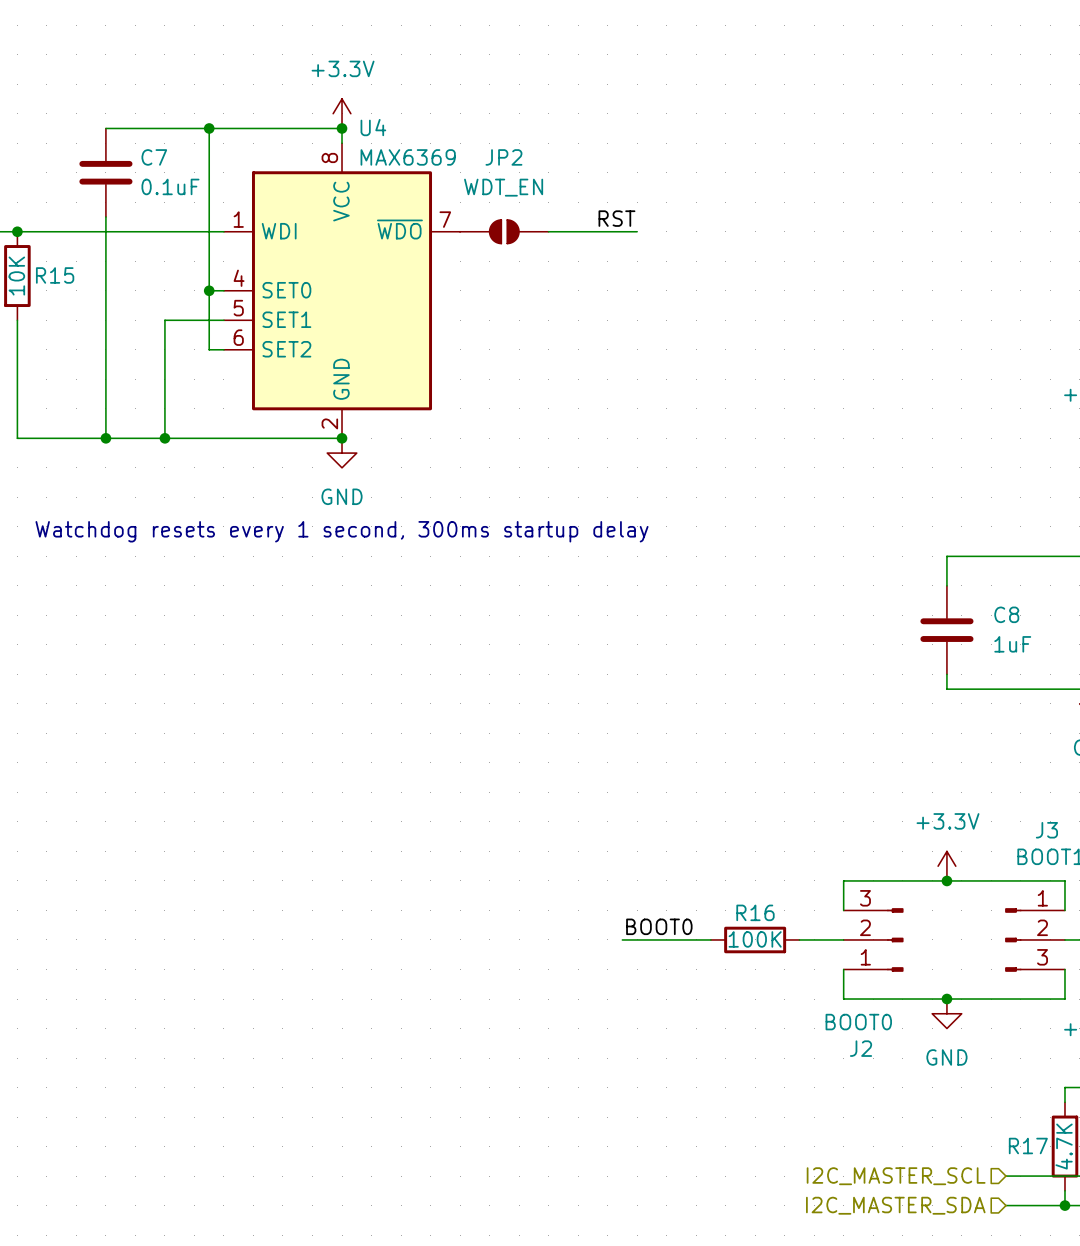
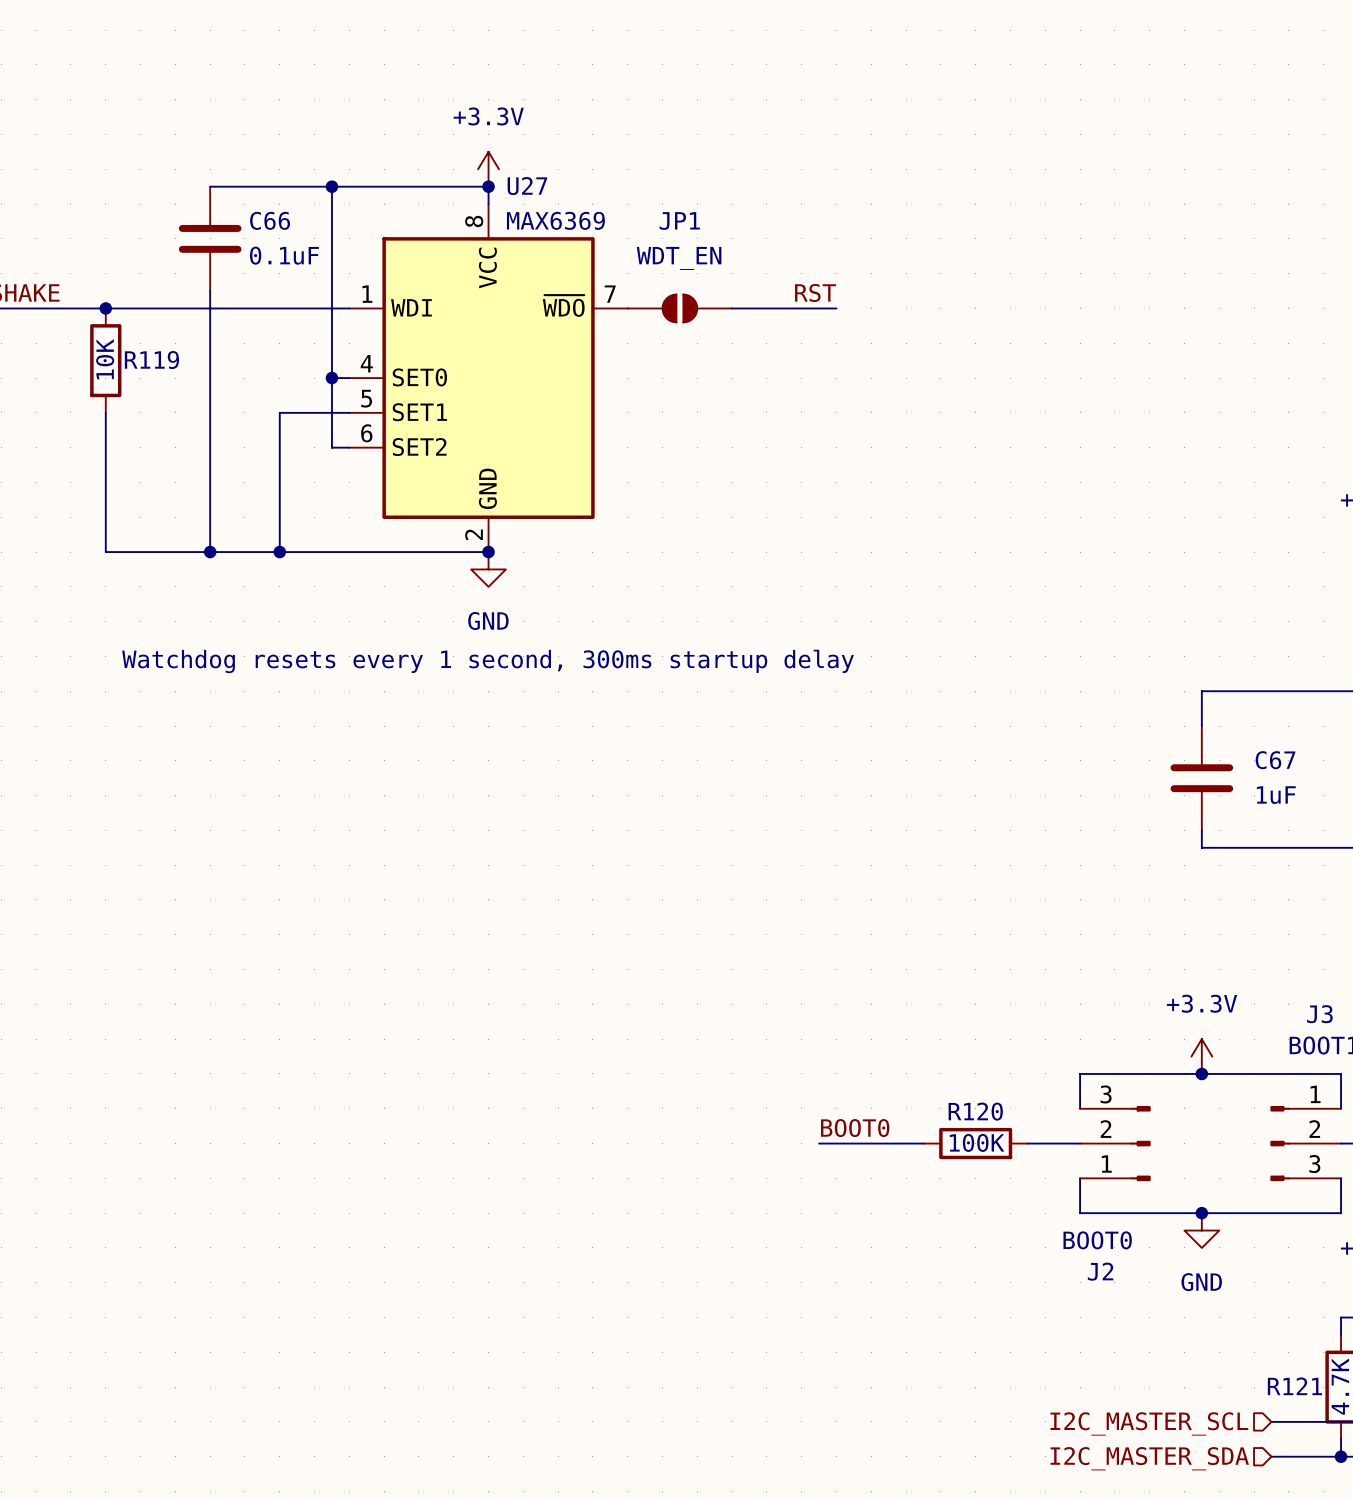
U4 name: U4 (373, 127) -> U27 (527, 186)
C7 name: C7 (154, 157) -> C66 (270, 220)
JP2 name: JP2 (503, 157) -> JP1 (679, 221)
R15 name: R15 (55, 275) -> R119 (151, 360)
C8 name: C8 (1006, 614) -> C67 (1275, 760)
R16 name: R16 (755, 912) -> R120 (975, 1111)
R17 name: R17 (1028, 1146) -> R121 (1294, 1386)

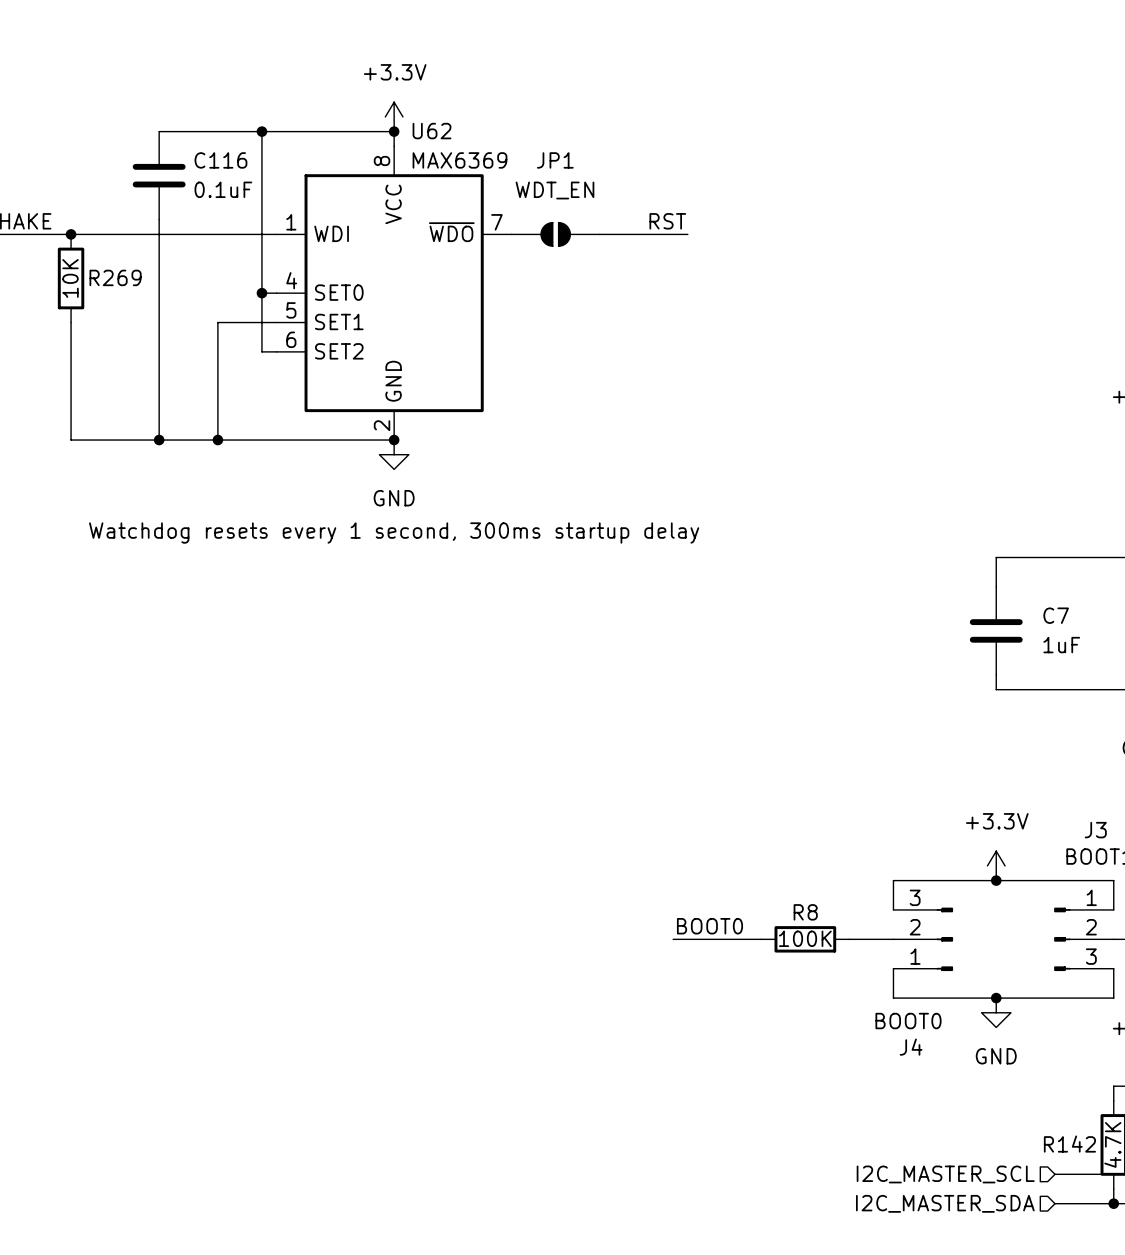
U27 name: U27 (527, 186) -> U62 (432, 131)
C66 name: C66 (270, 220) -> C116 (220, 160)
R119 name: R119 (151, 360) -> R269 (115, 277)
C67 name: C67 (1275, 760) -> C7 (1056, 615)
R120 name: R120 (975, 1111) -> R8 (805, 912)
J2 name: J2 (1100, 1271) -> J4 (911, 1047)
R121 name: R121 (1294, 1386) -> R142 (1069, 1144)

